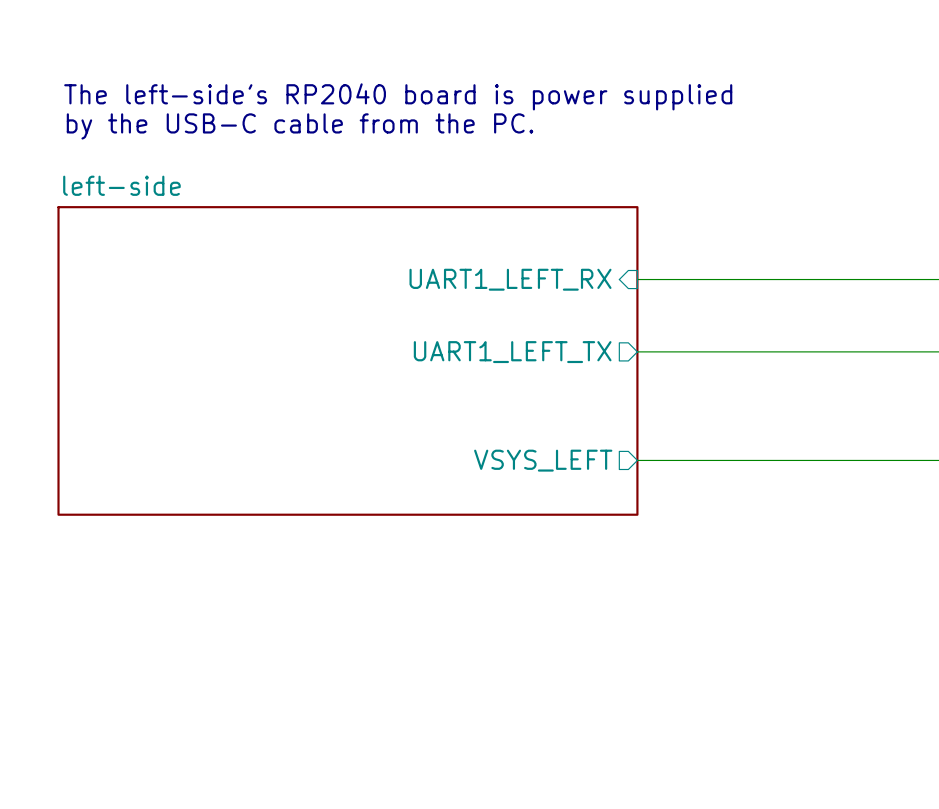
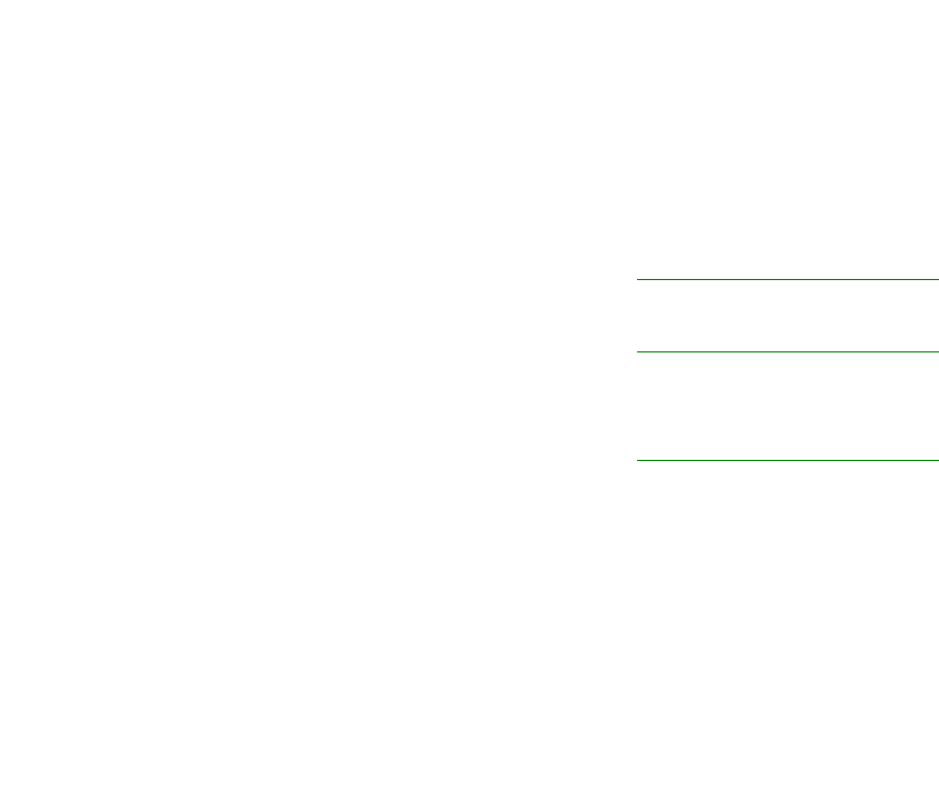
text: The left-side's RP2040 board is power supplied (398, 96) -> none
text: by the USB-C cable from the PC. (300, 126) -> none
sheet pin: UART1_LEFT_RX (510, 279) -> none
sheet pin: UART1_LEFT_TX (512, 352) -> none
sheet left-side: (347, 360) -> none
sheet pin: VSYS_LEFT (543, 460) -> none

